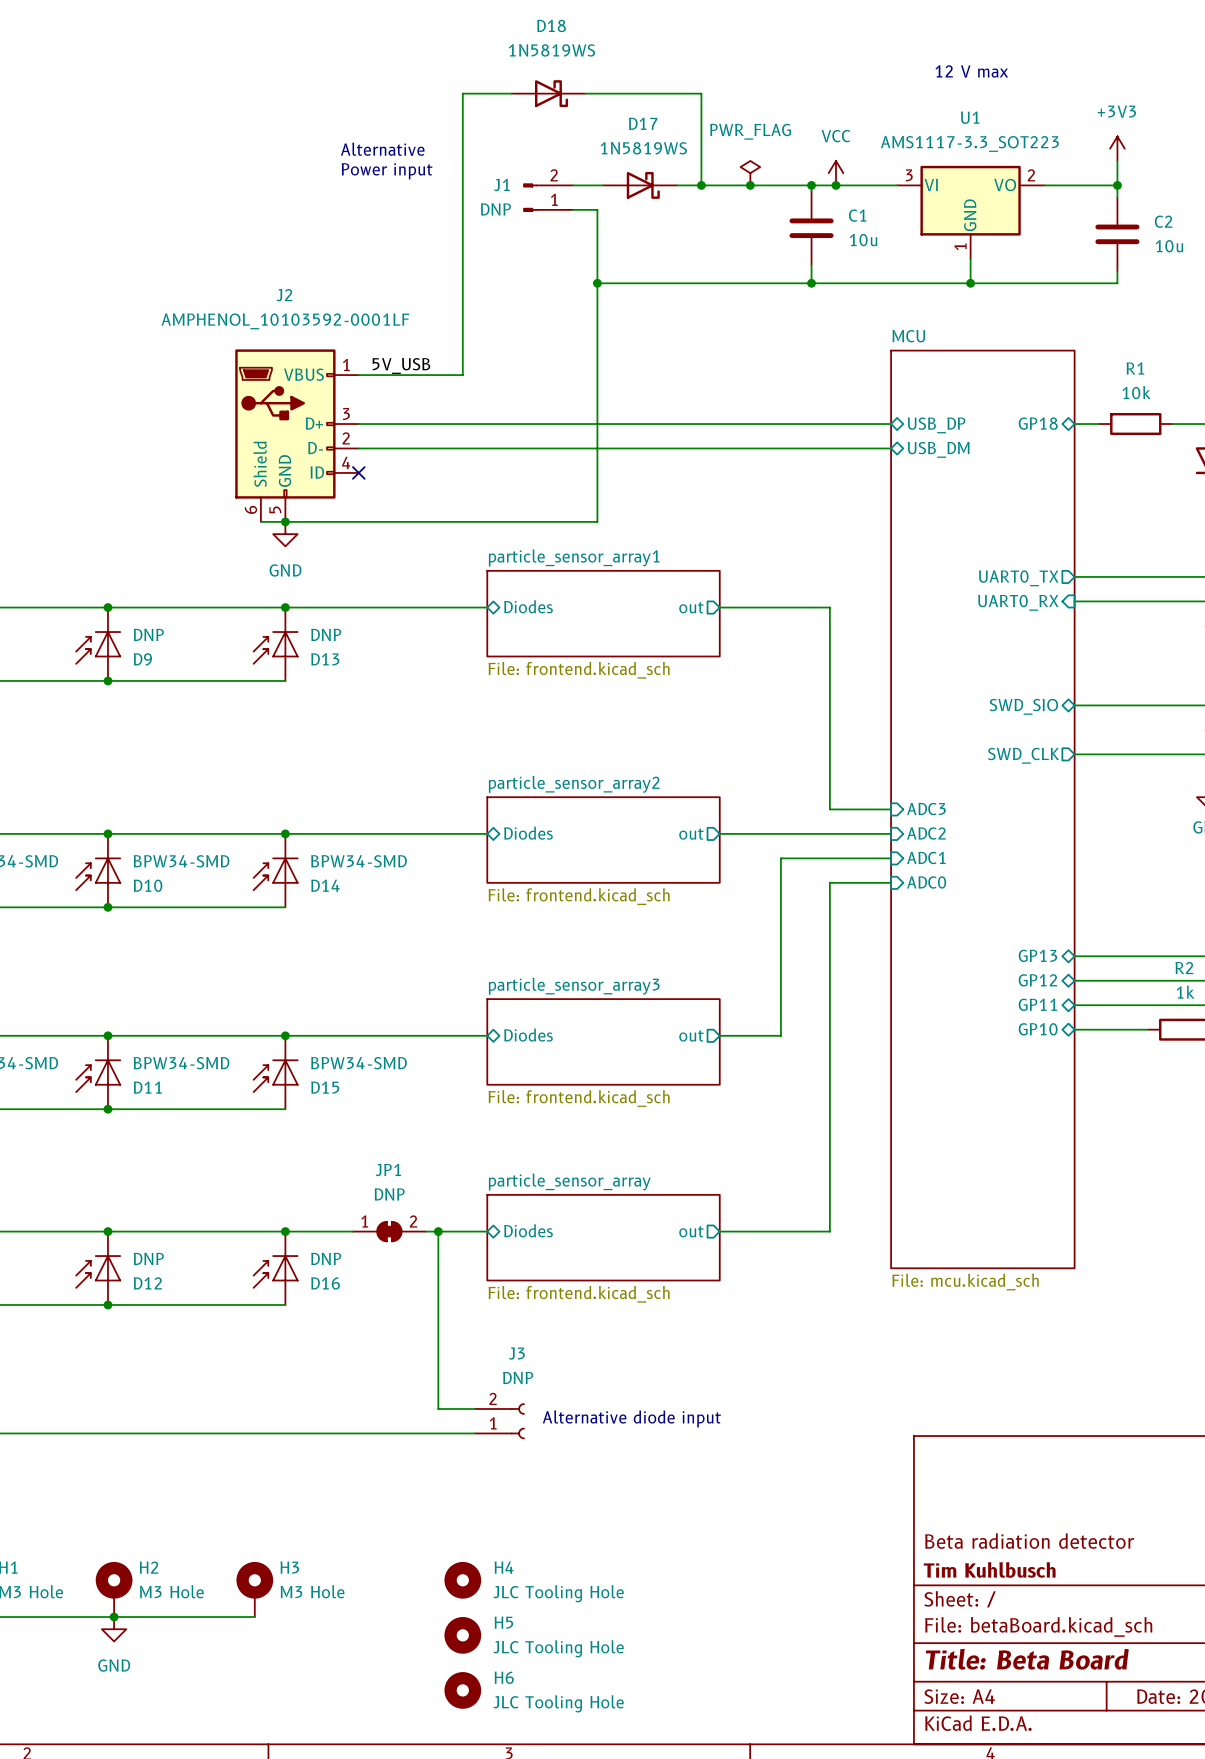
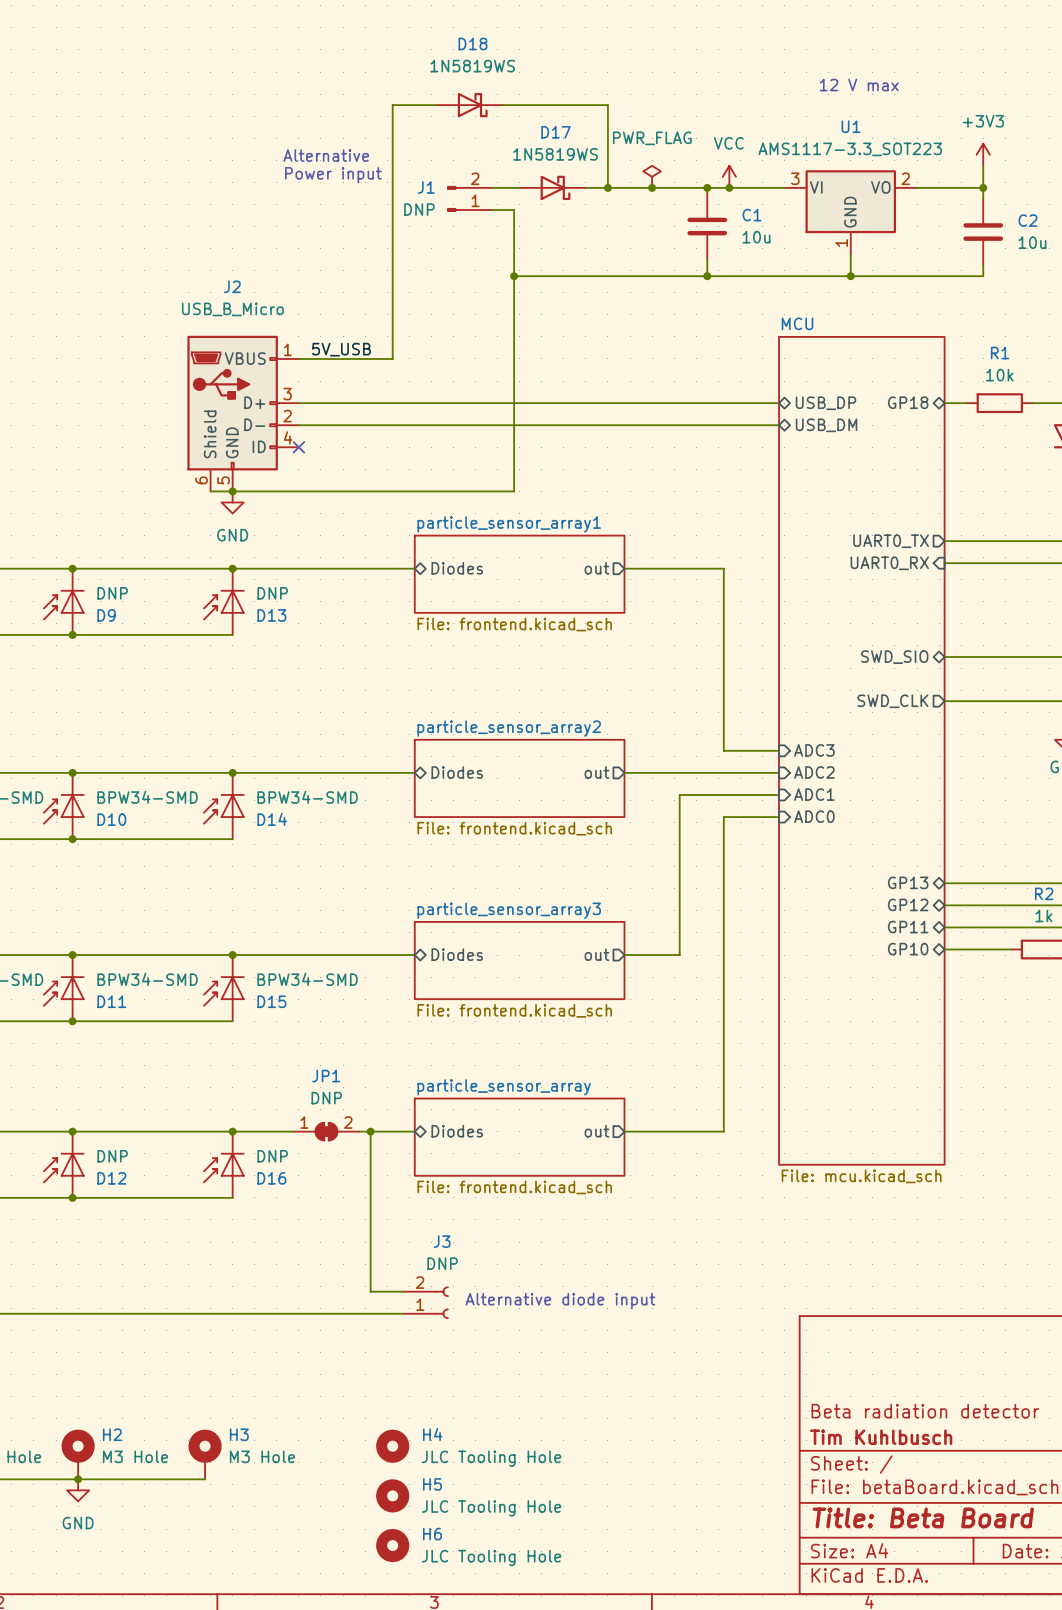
J2 value: AMPHENOL_10103592-0001LF (285, 321) -> USB_B_Micro (232, 309)

